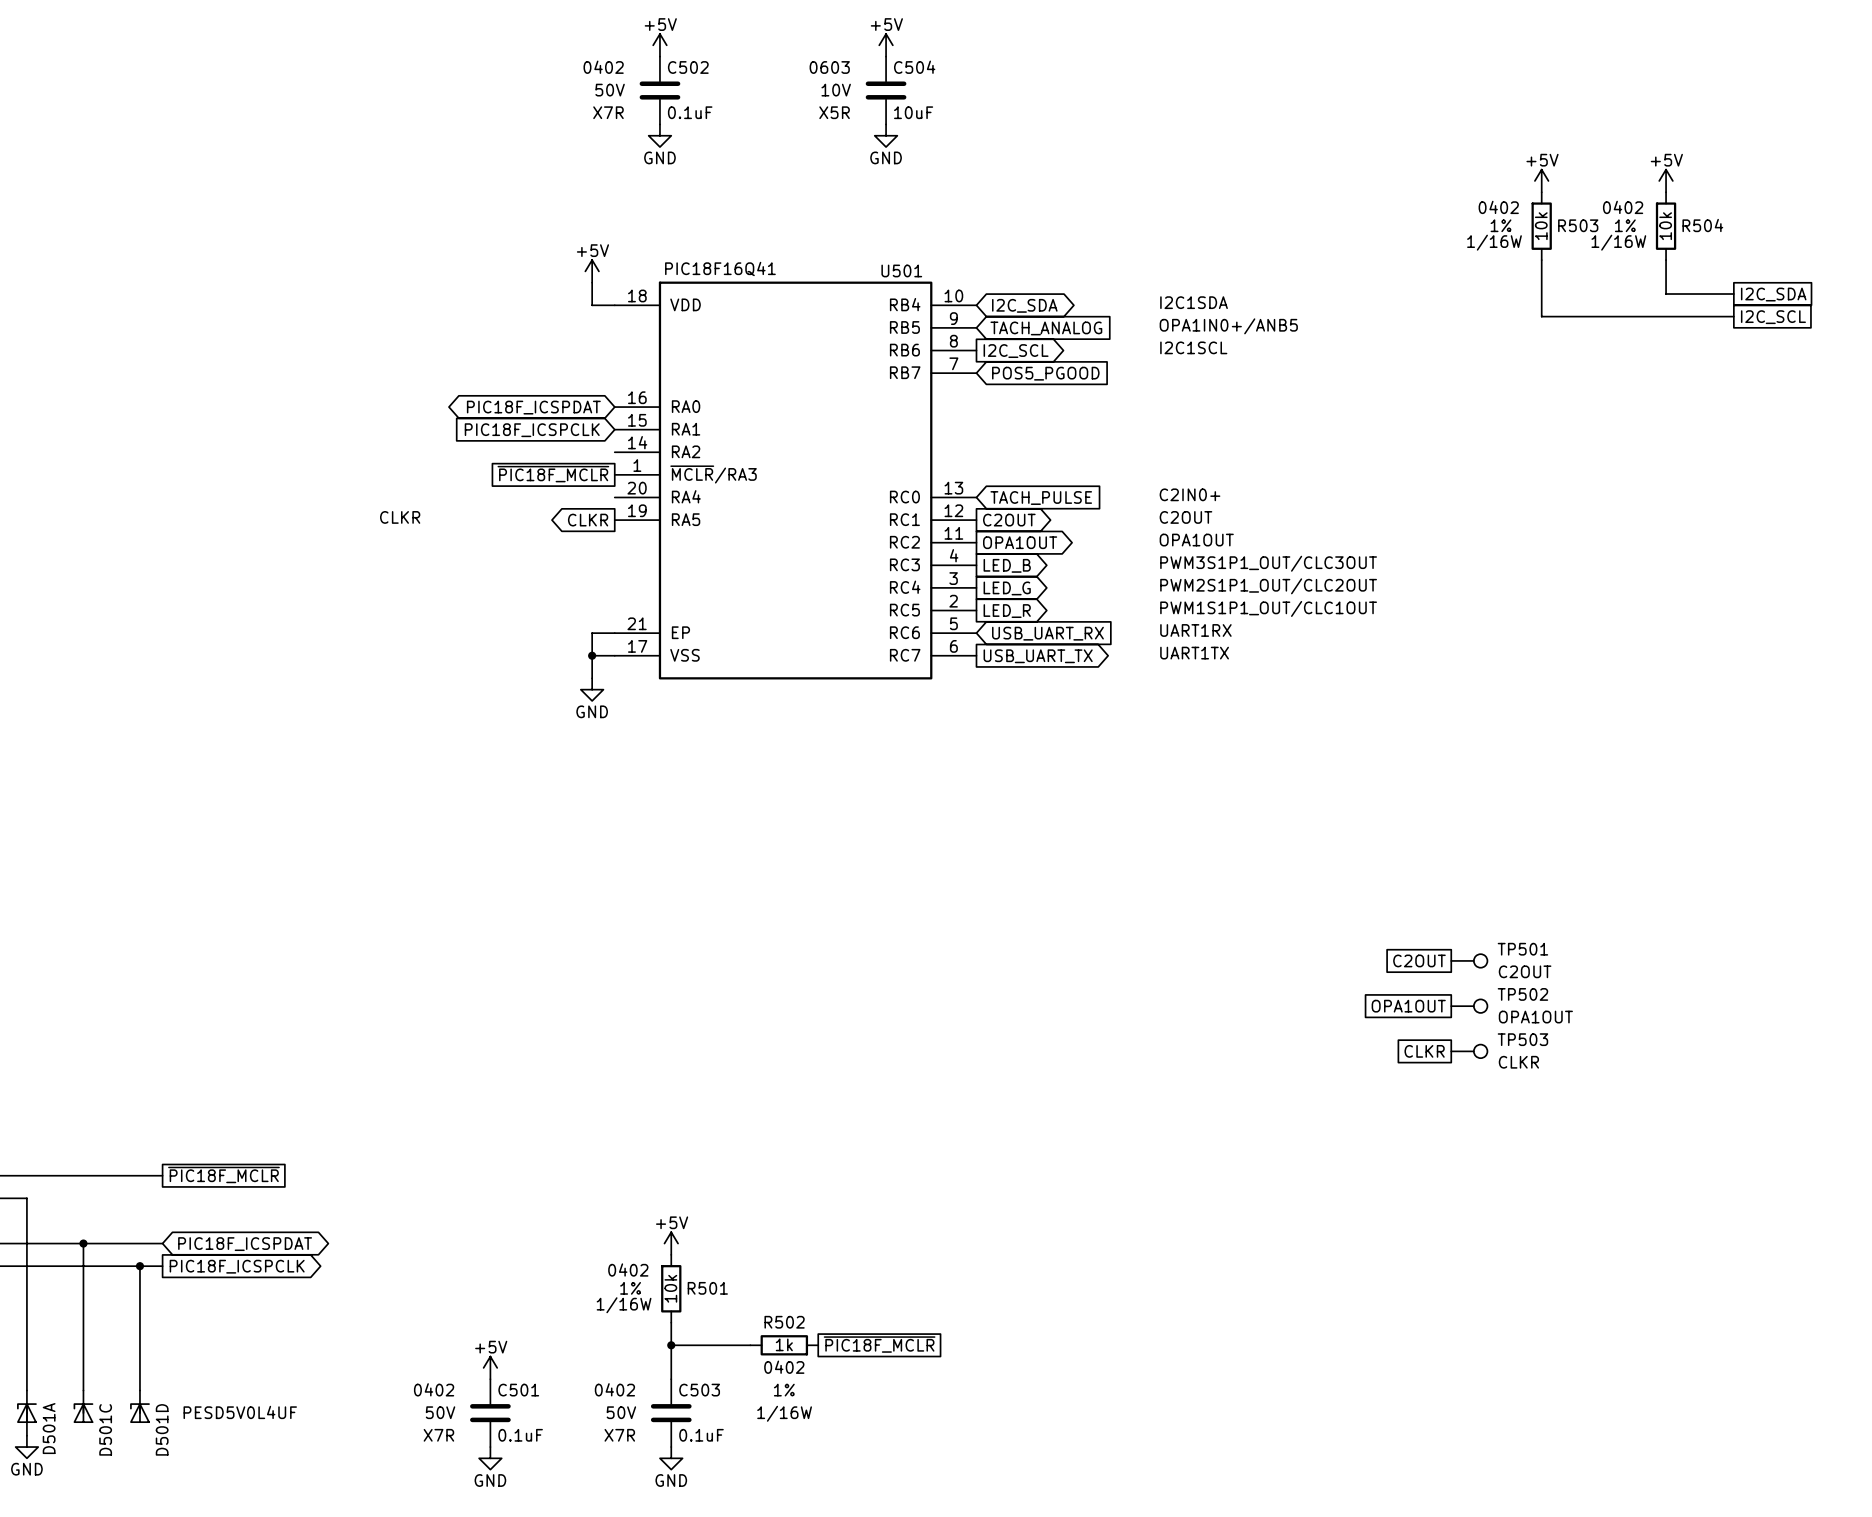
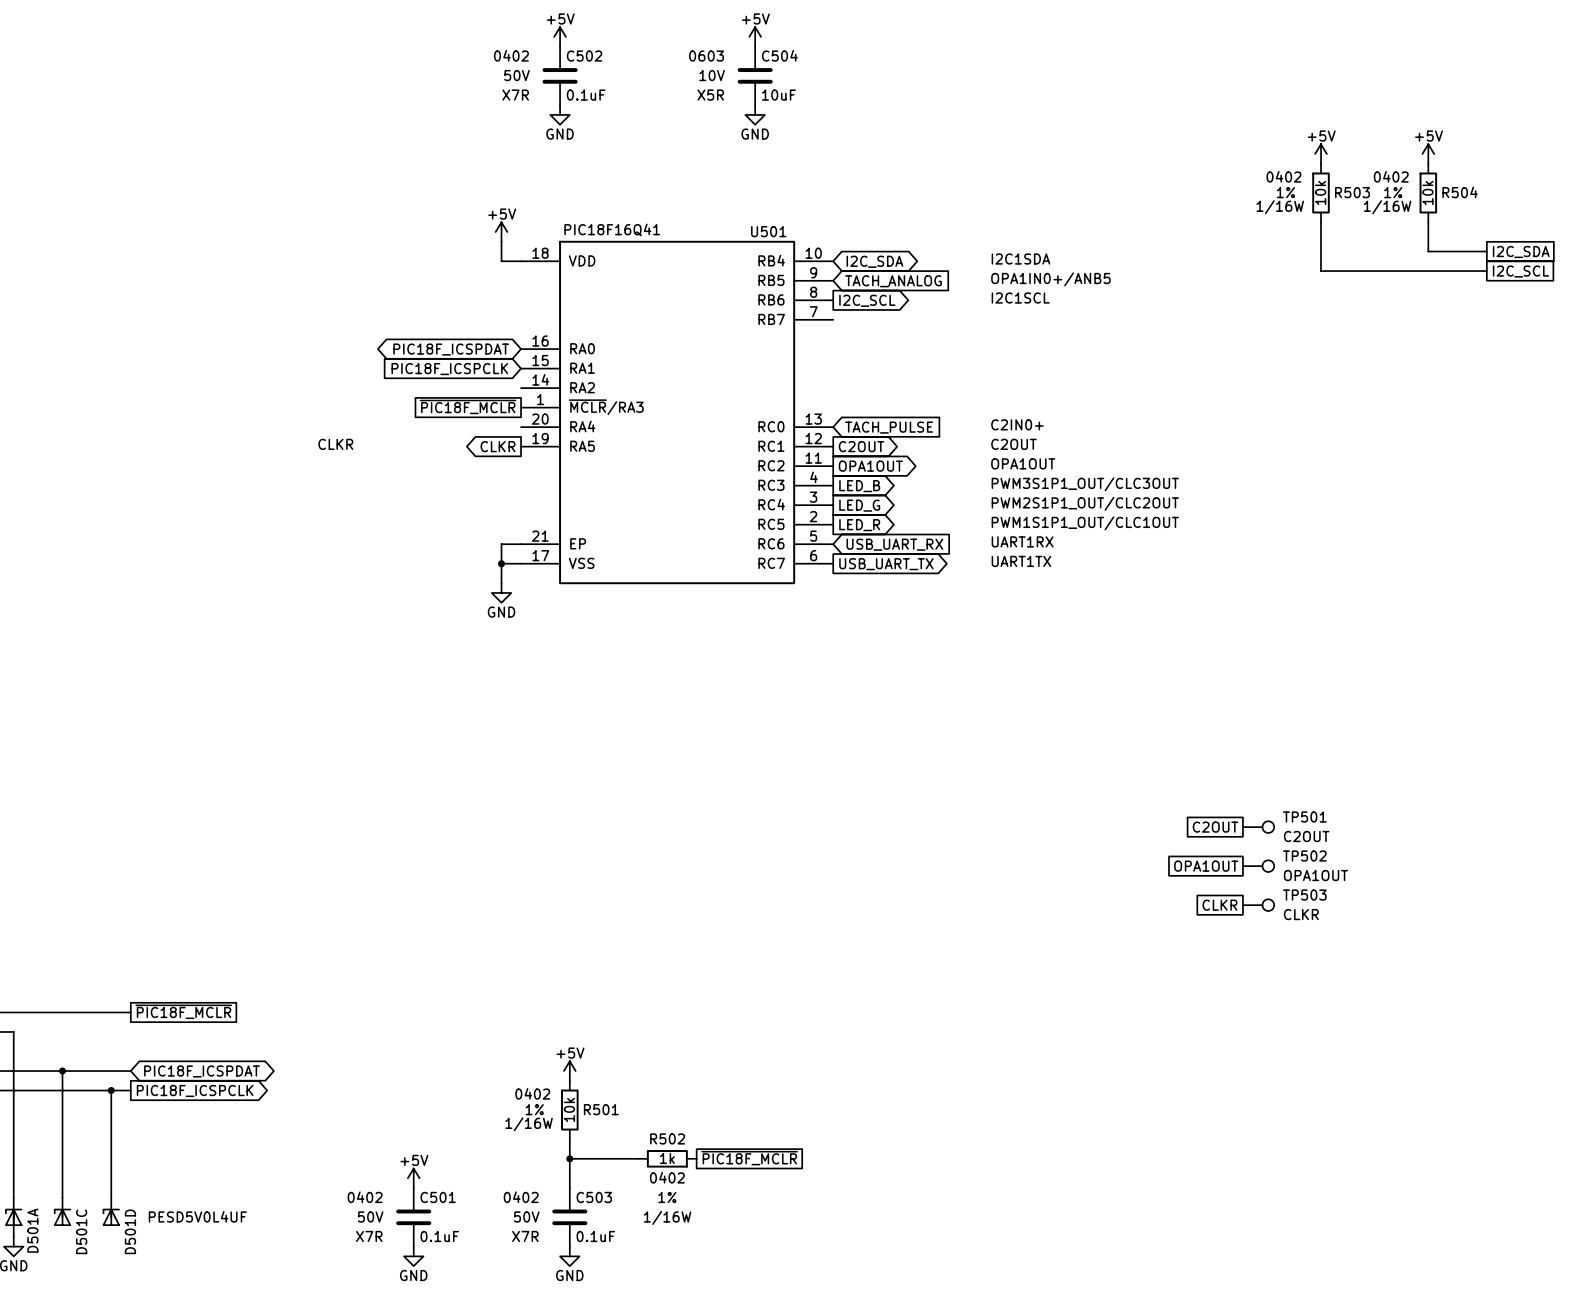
global label: POS5_PGOOD (1045, 373) -> none

